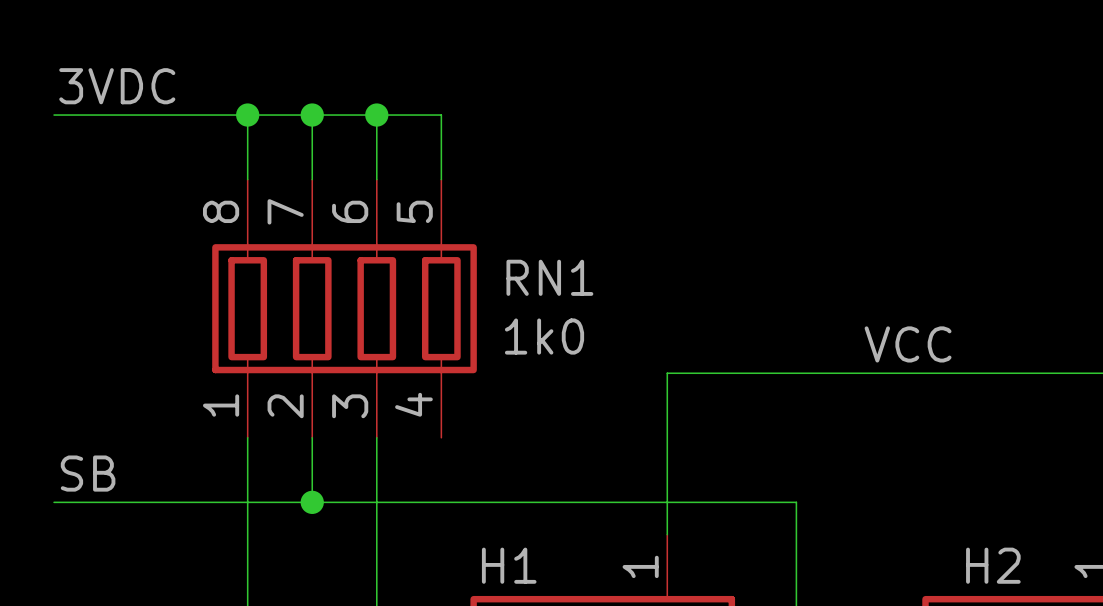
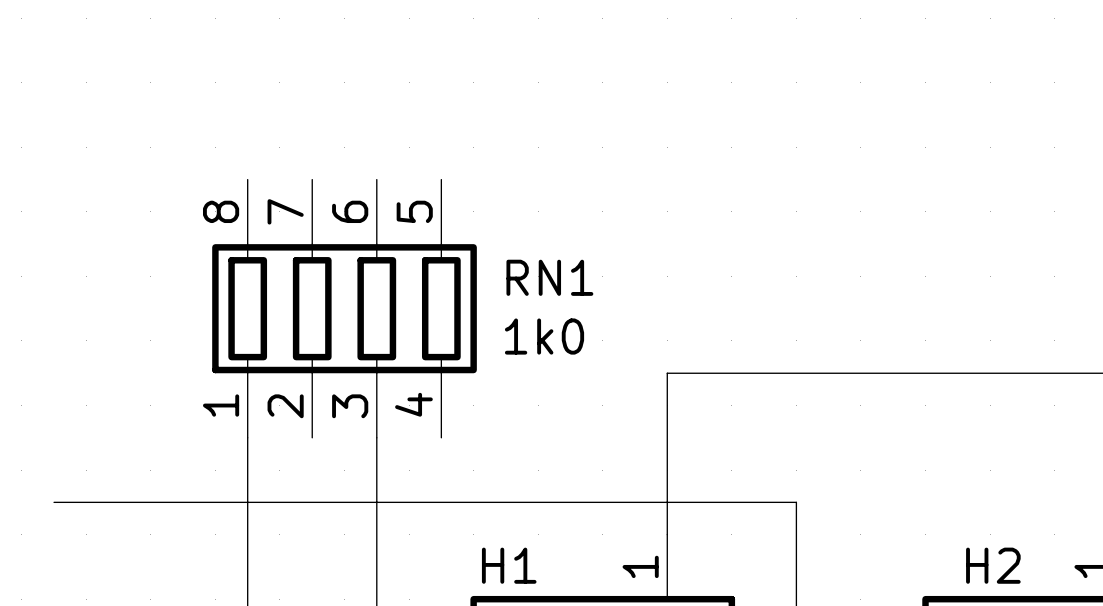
label: 3VDC (117, 86) -> none
wire: (54, 115) (441, 115) (441, 179) -> none
wire: (247, 115) (247, 179) -> none
junction: (247, 115) -> none
wire: (312, 115) (312, 179) -> none
junction: (312, 115) -> none
wire: (376, 115) (376, 179) -> none
junction: (376, 115) -> none
label: VCC (908, 344) -> none
wire: (312, 437) (312, 502) -> none
label: SB (88, 473) -> none
junction: (312, 502) -> none

